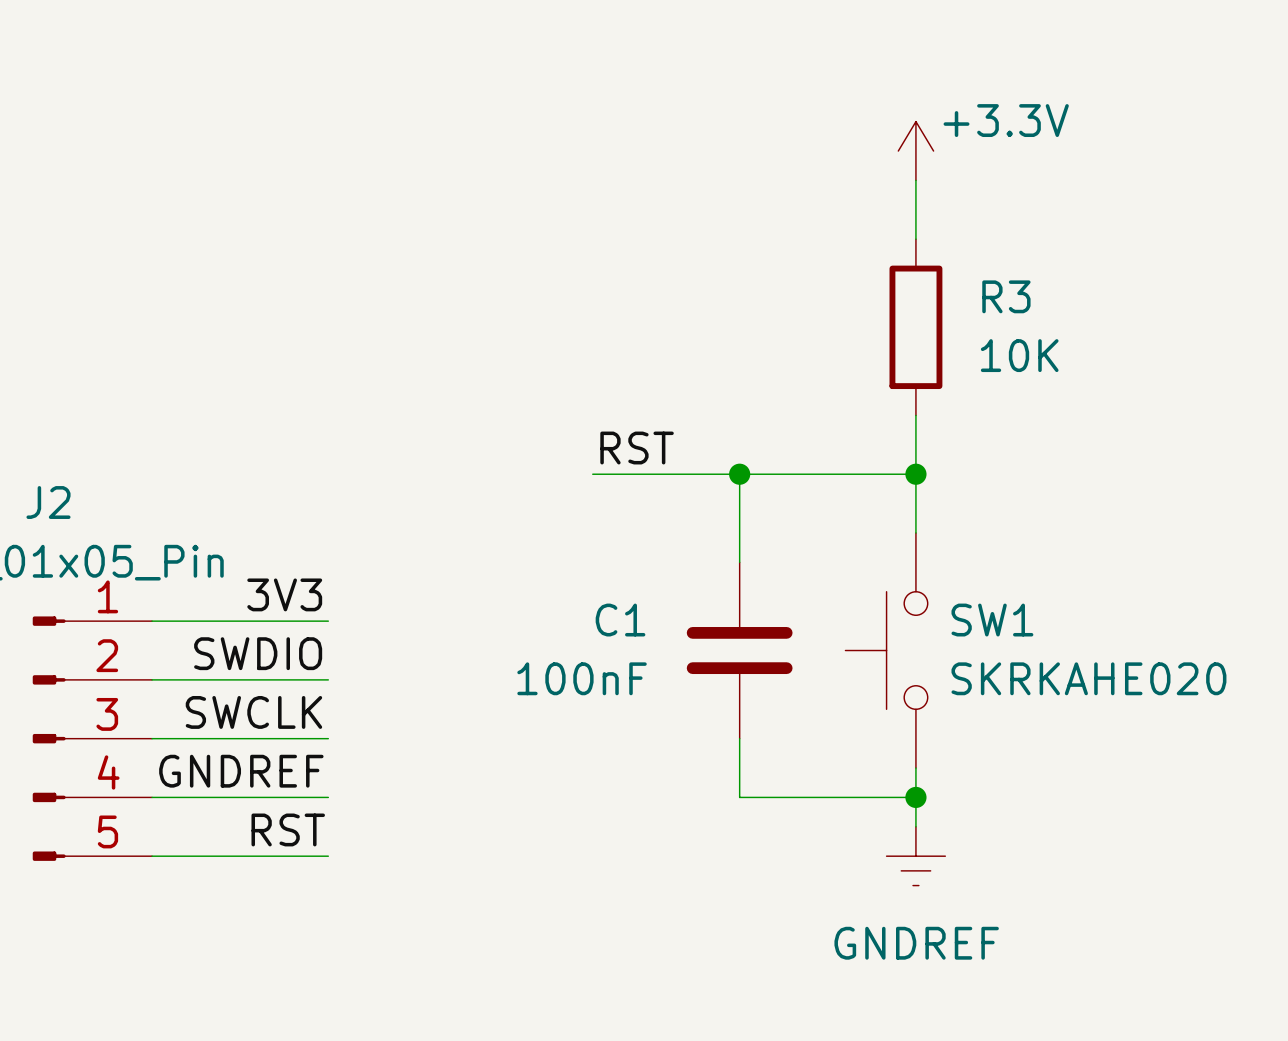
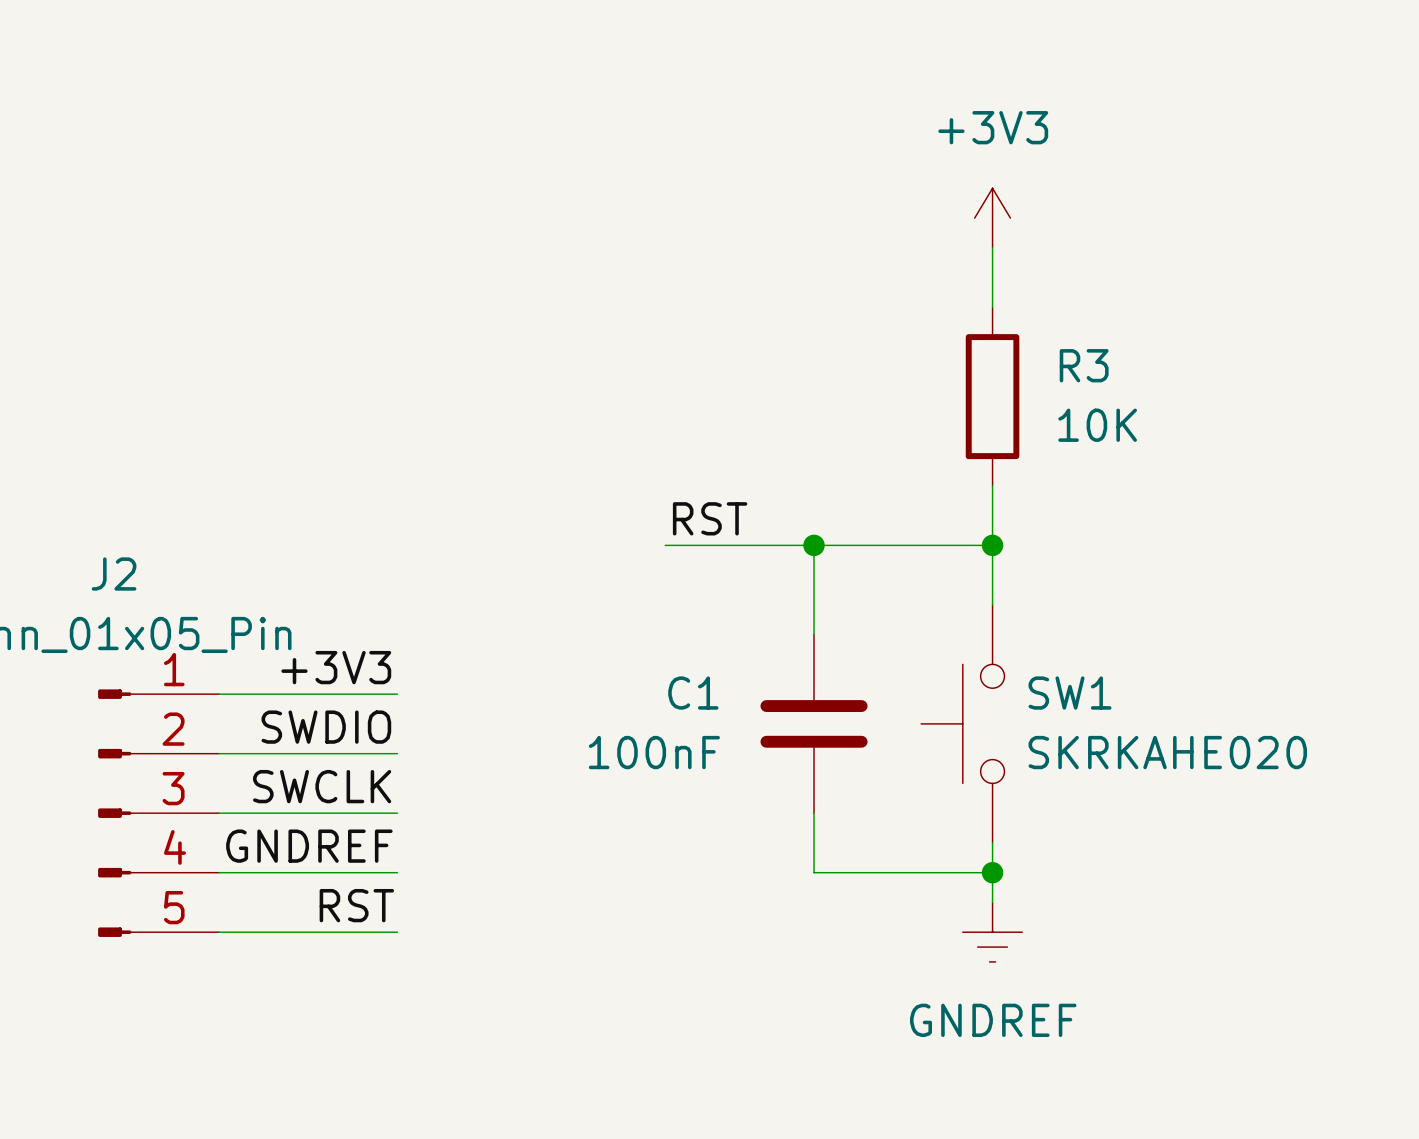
power symbol: +3.3V (915, 151) -> +3V3 (992, 218)
label: 3V3 (284, 594) -> +3V3 (336, 667)

